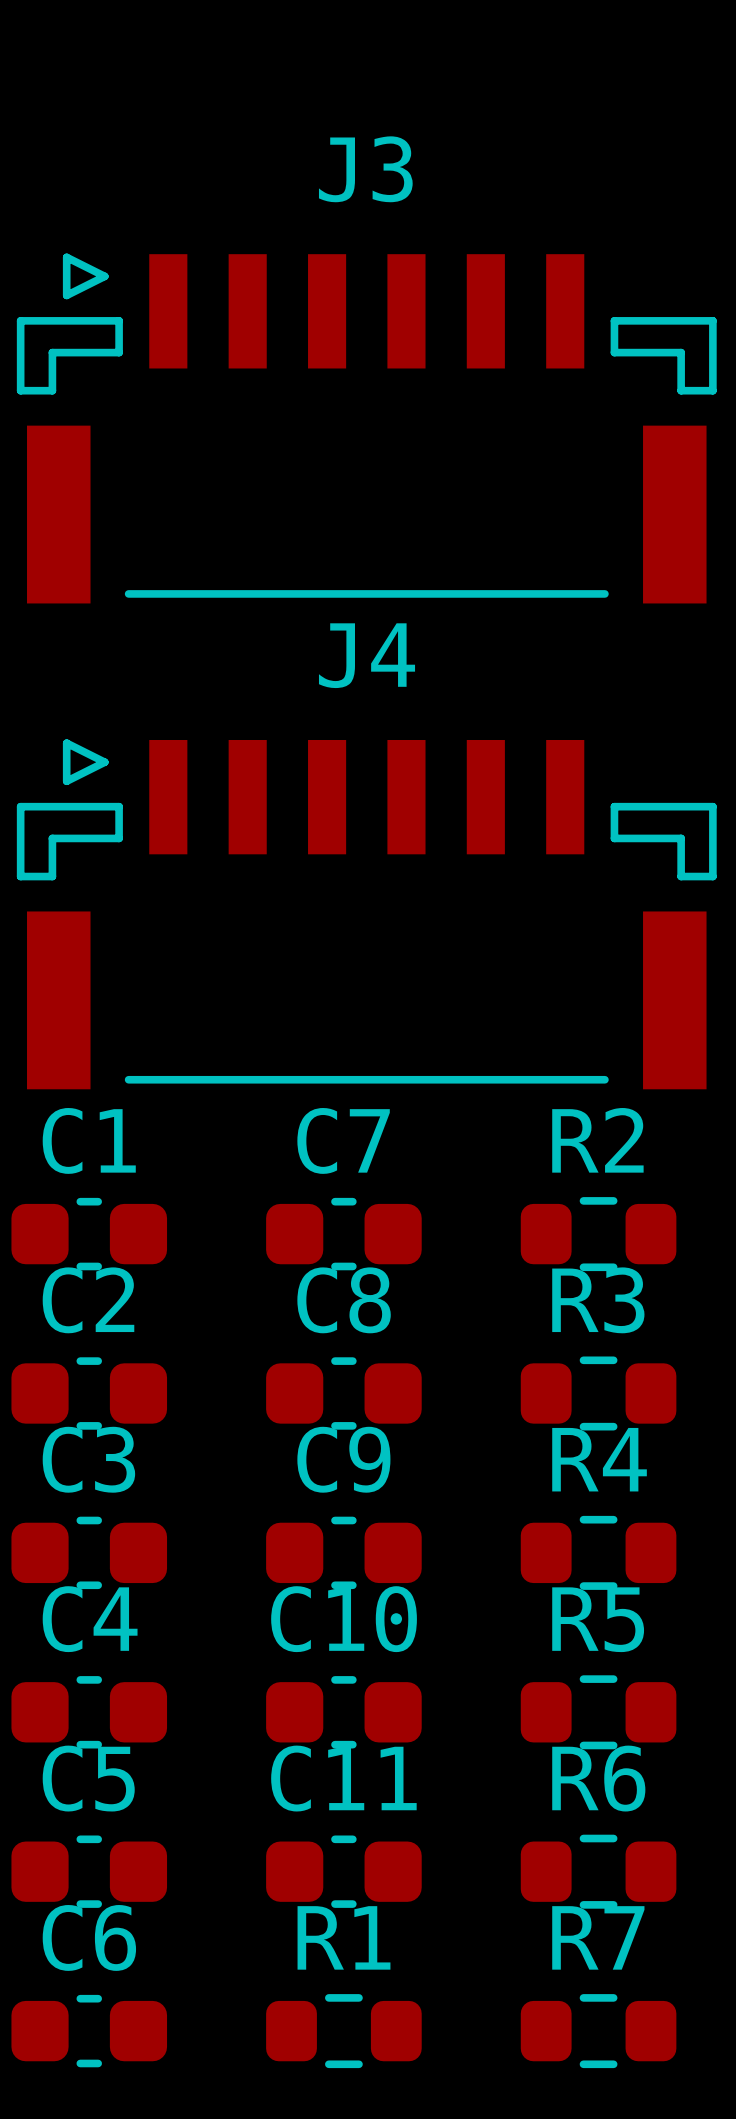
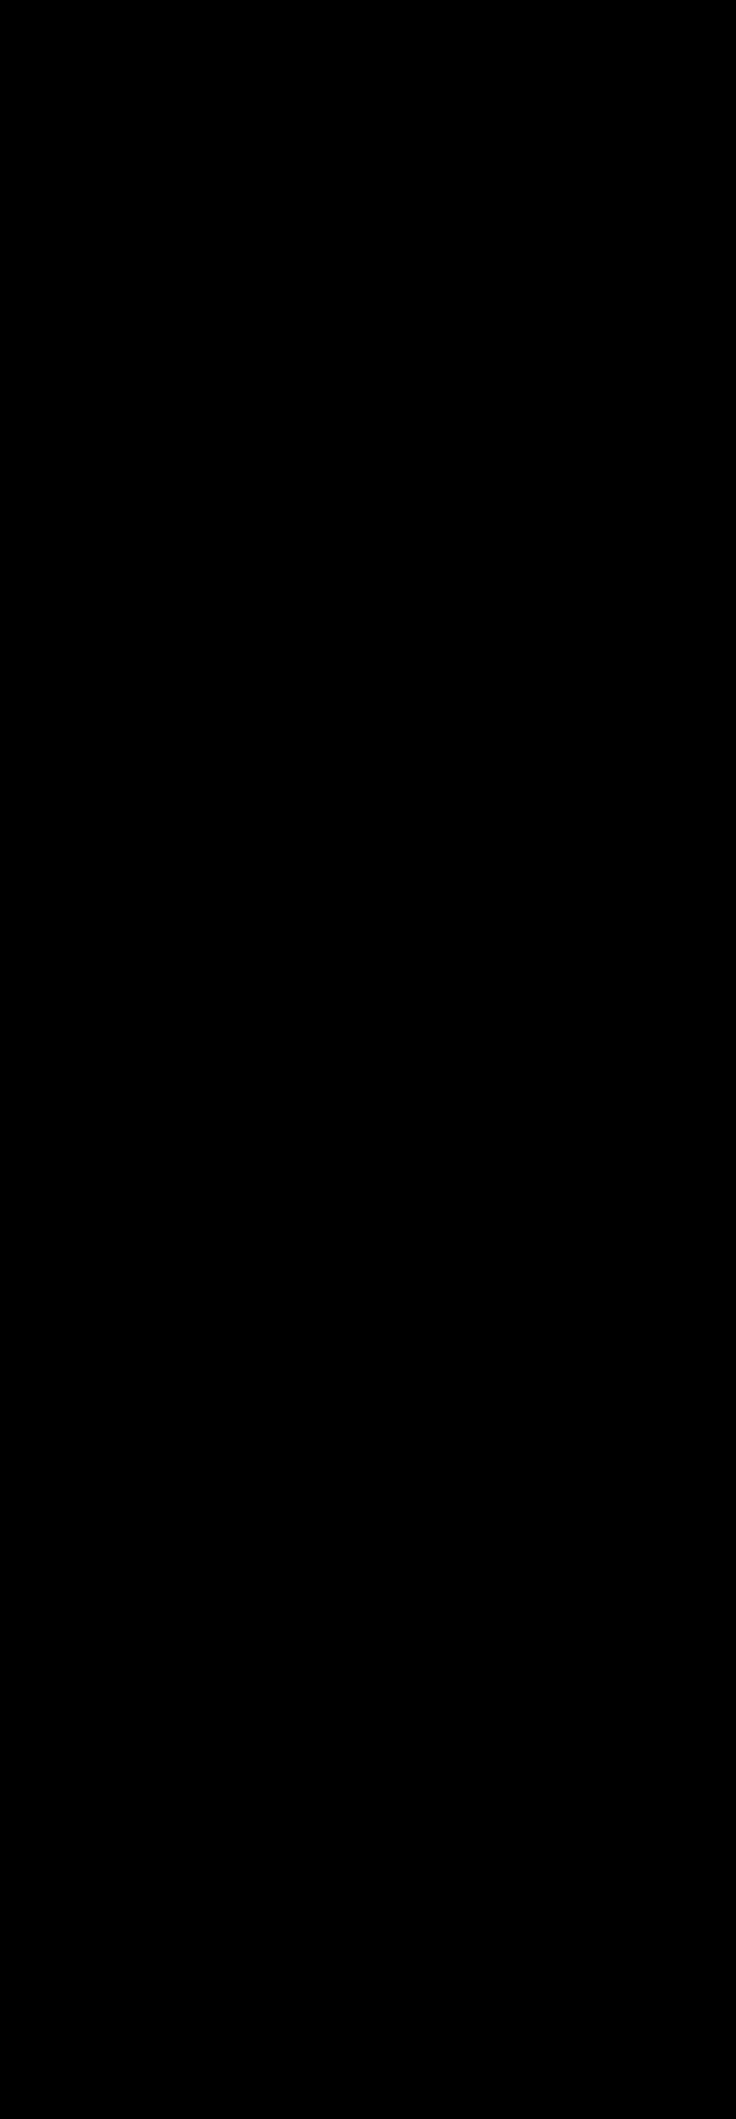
J3: (366, 428) -> none
J4: (366, 914) -> none
C1: (89, 1234) -> none
C7: (343, 1234) -> none
R2: (598, 1234) -> none
C2: (89, 1393) -> none
C8: (343, 1393) -> none
R3: (598, 1393) -> none
C3: (89, 1552) -> none
C9: (343, 1552) -> none
R4: (598, 1552) -> none
C4: (89, 1712) -> none
C10: (343, 1712) -> none
R5: (598, 1712) -> none
C5: (89, 1871) -> none
C11: (343, 1871) -> none
R6: (598, 1871) -> none
C6: (89, 2031) -> none
R1: (343, 2031) -> none
R7: (598, 2031) -> none

